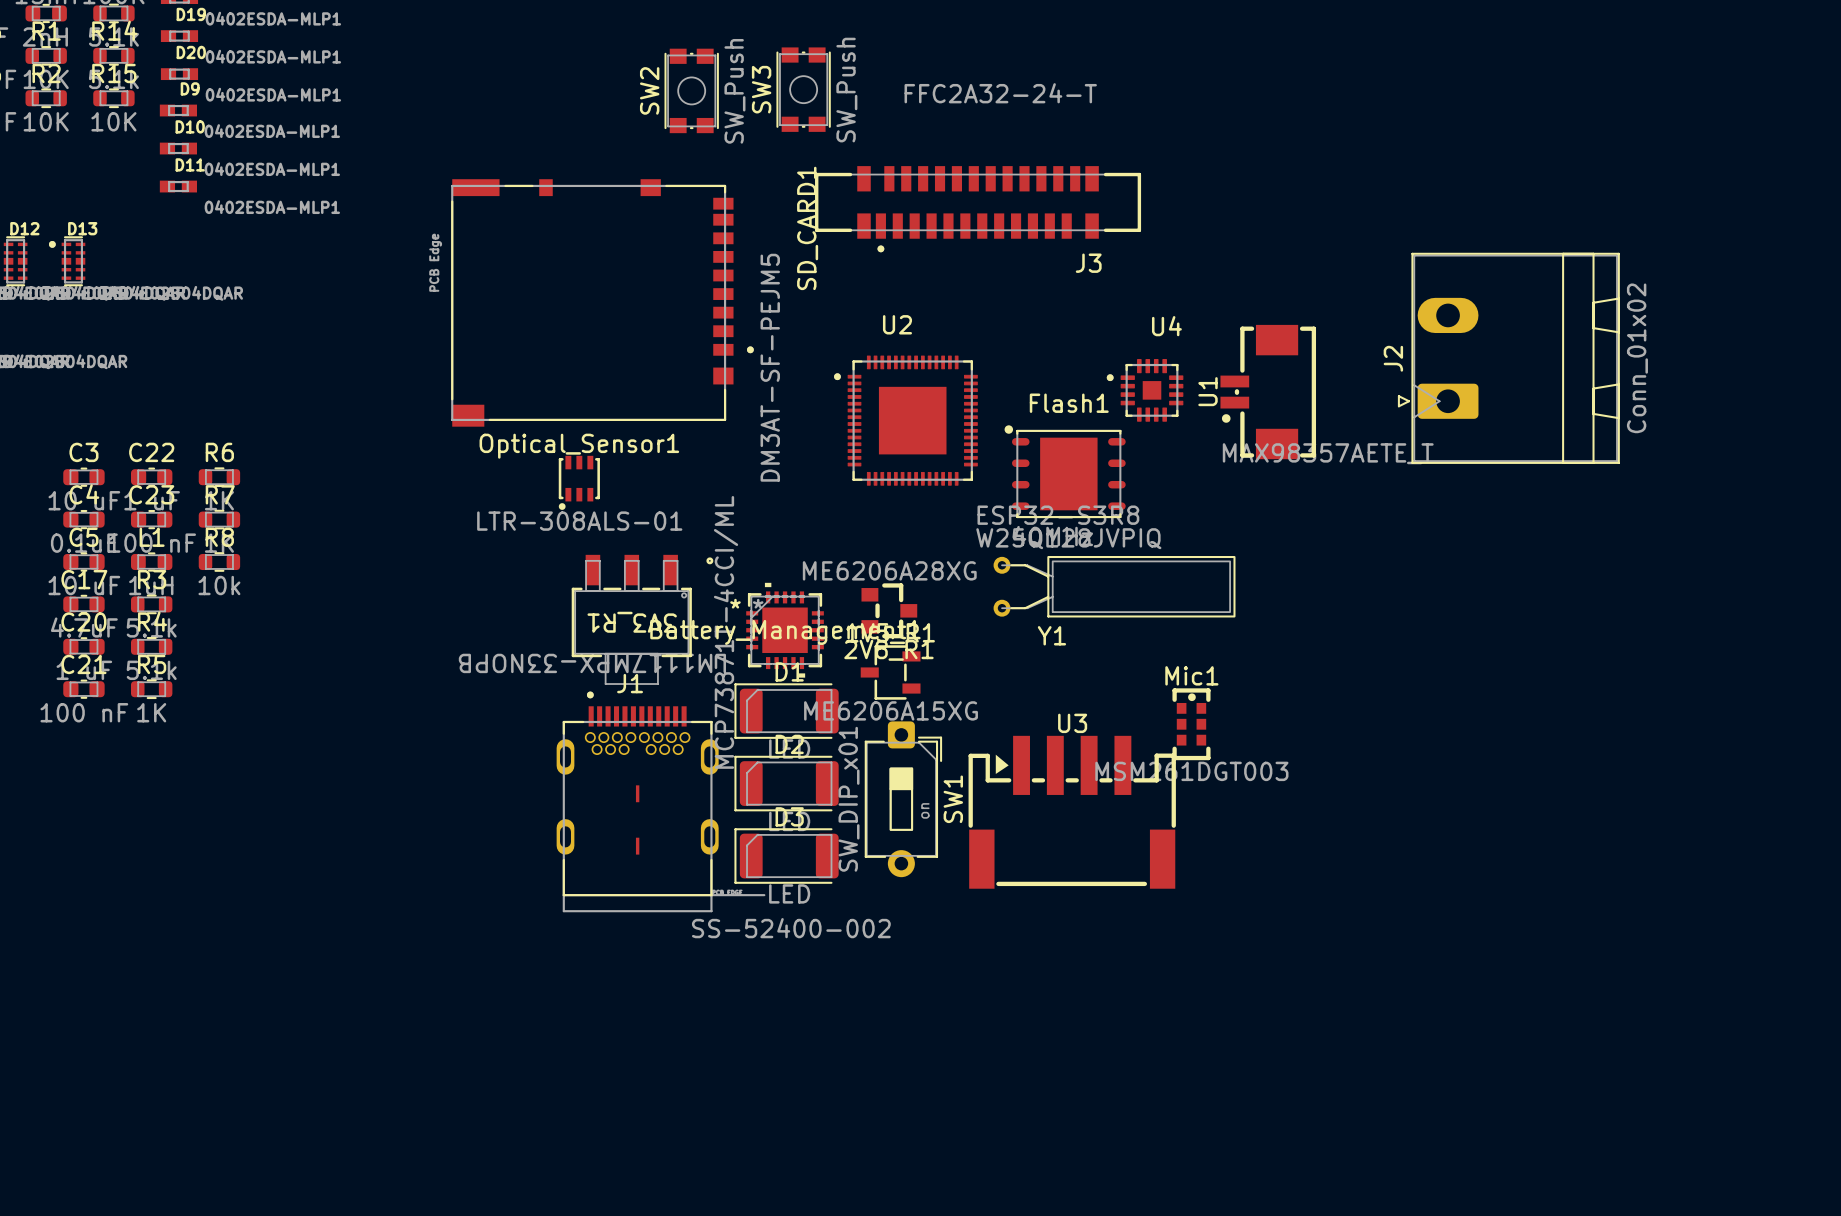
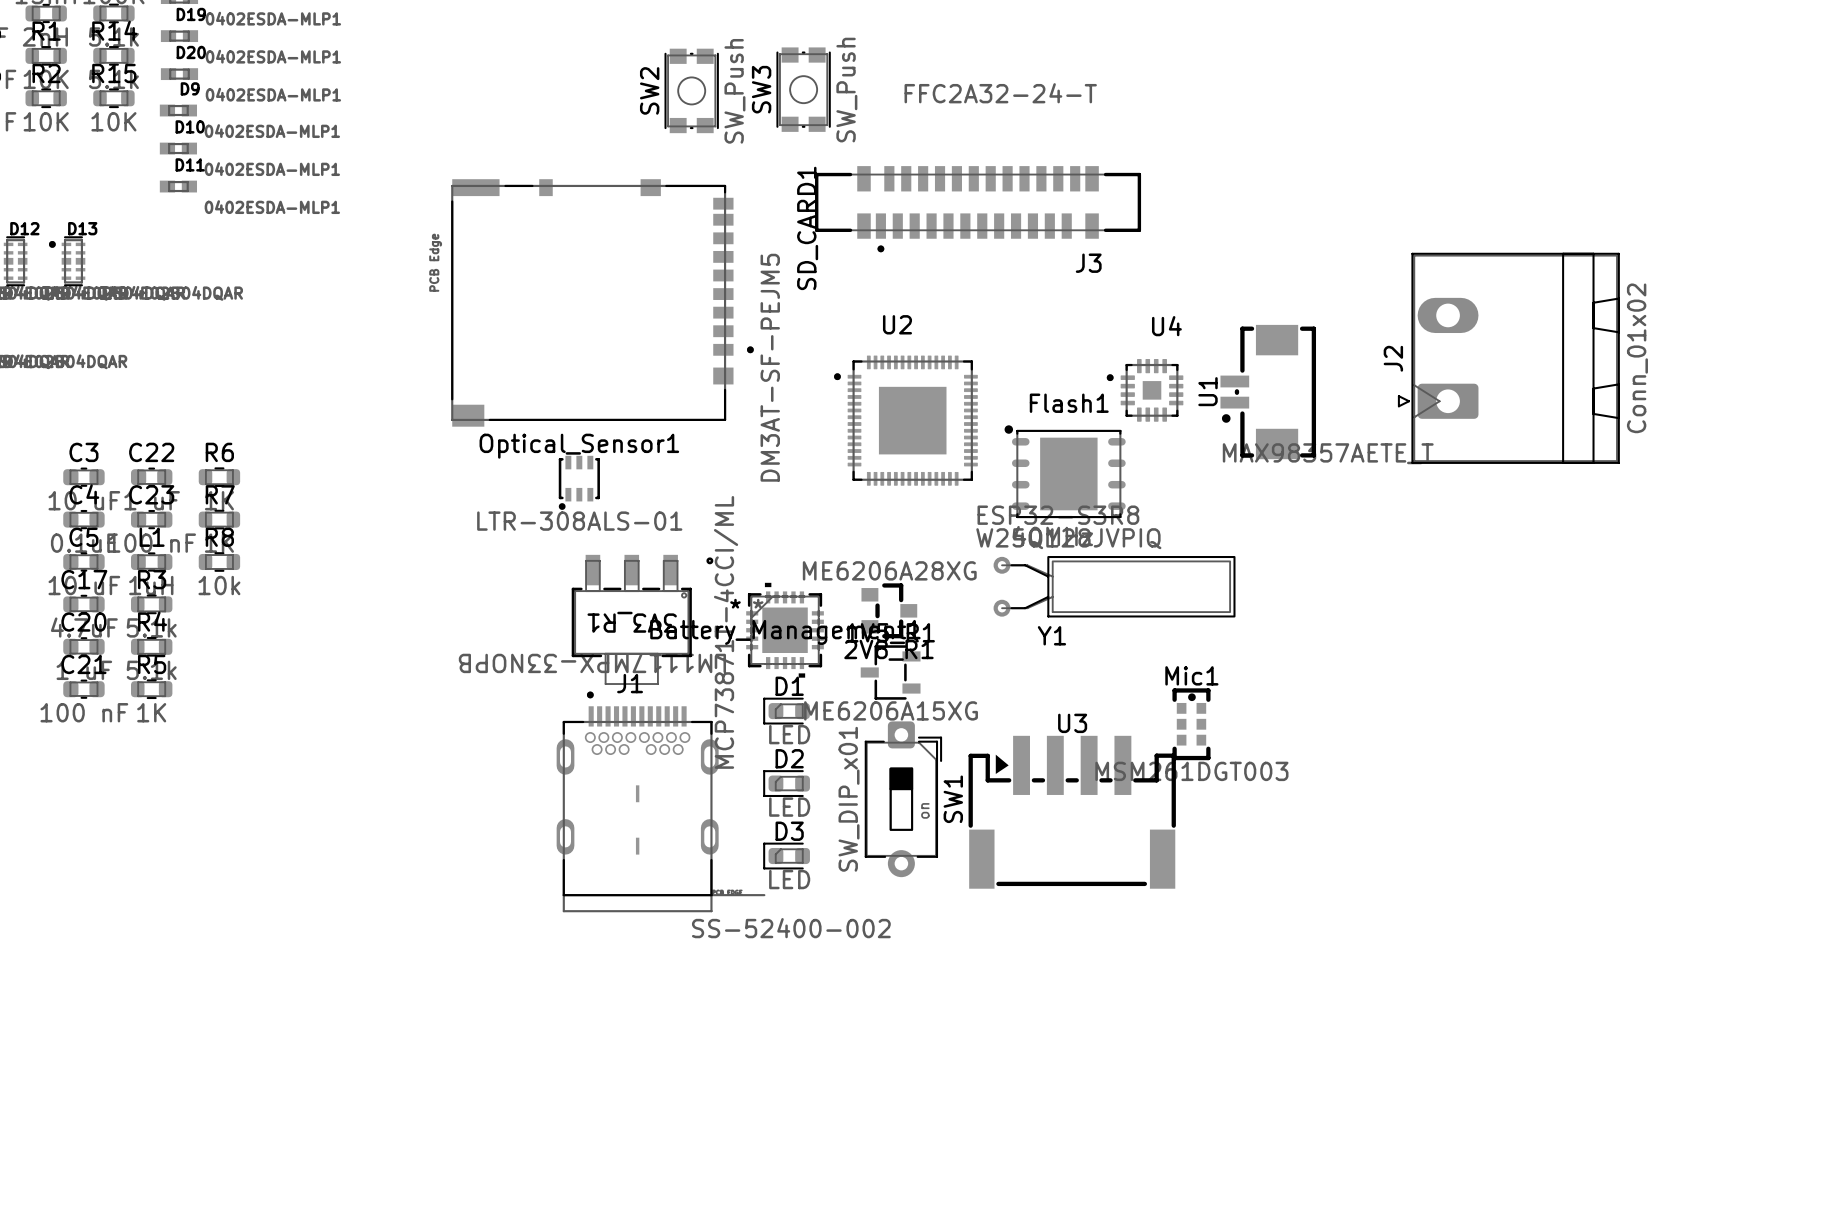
D1 footprint: [734, 683, 839, 739] -> [763, 697, 810, 725]
D2 footprint: [734, 755, 839, 812] -> [763, 770, 810, 797]
D3 footprint: [734, 828, 839, 884] -> [763, 842, 810, 870]

